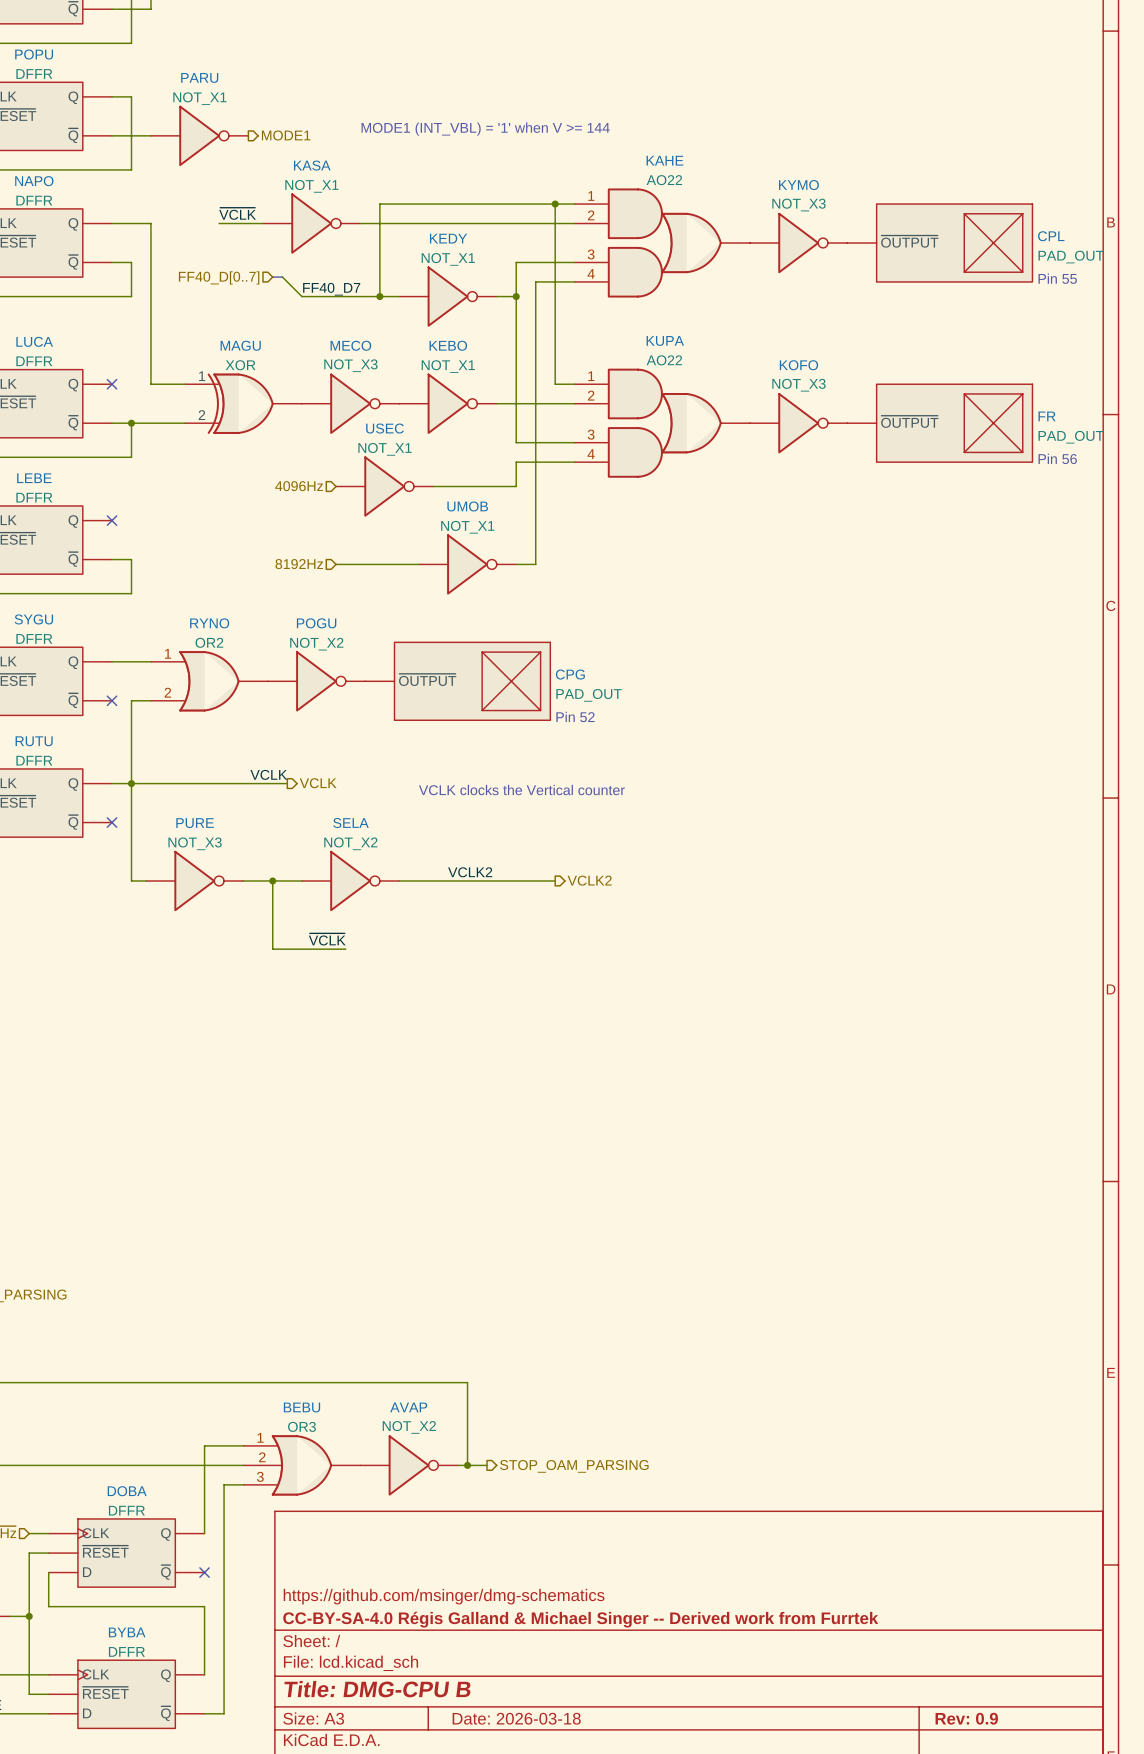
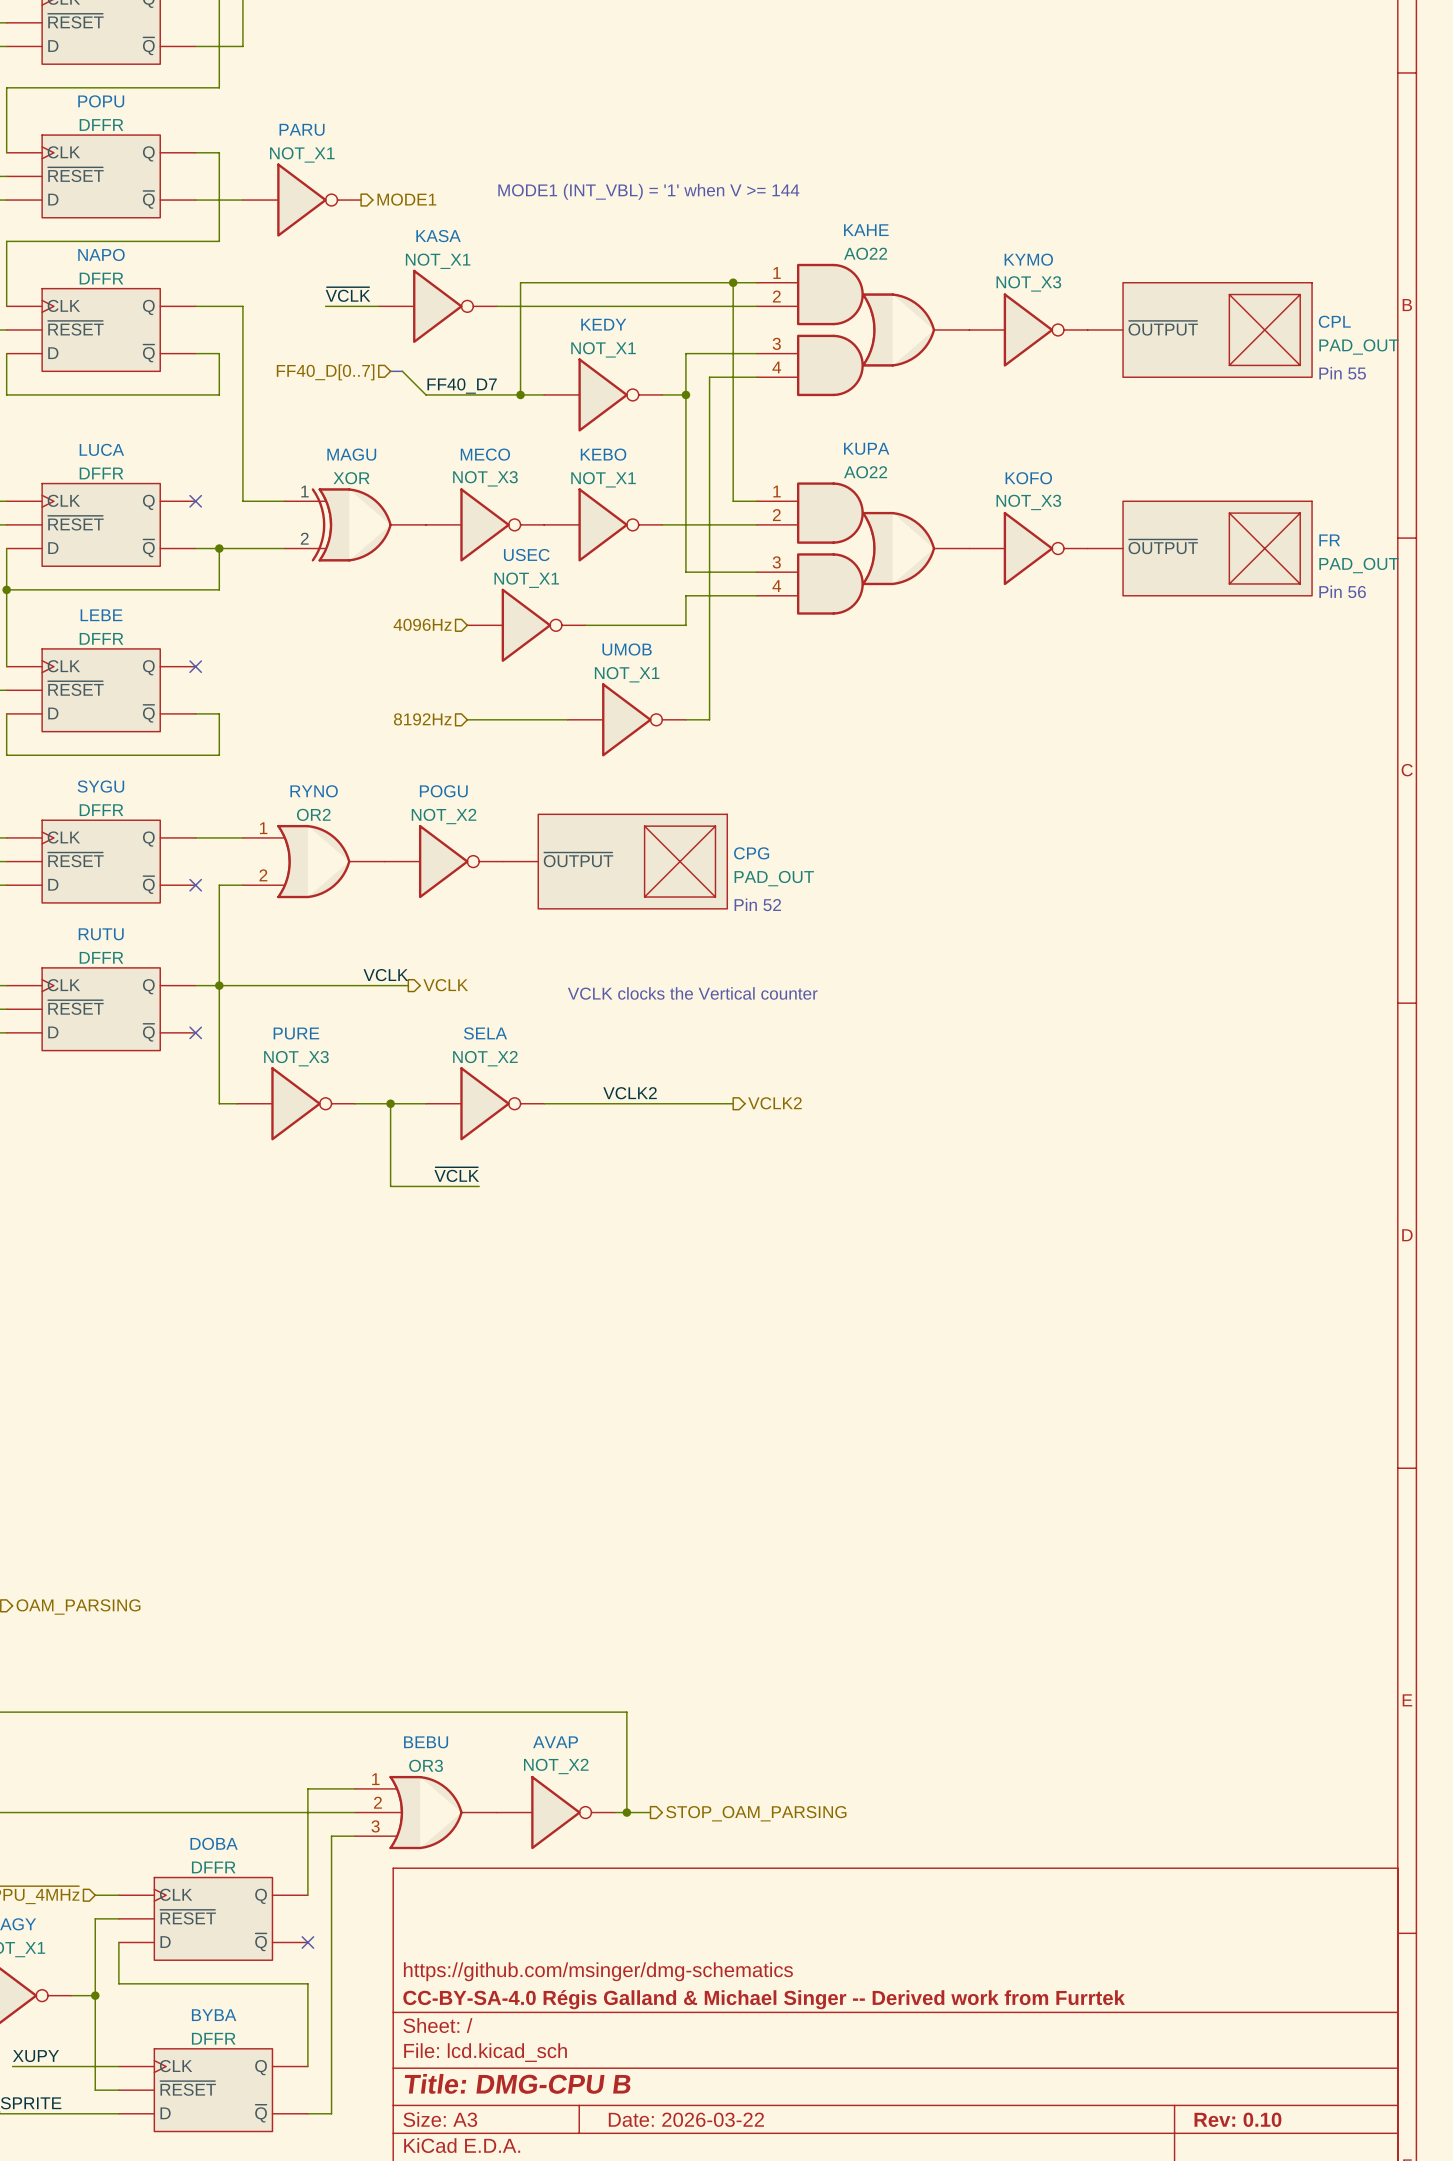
title block: Date: 2026-03-18 (516, 1718) -> Date: 2026-03-22 (686, 2119)
title block: Rev: 0.9 (966, 1718) -> Rev: 0.10 (1237, 2119)

